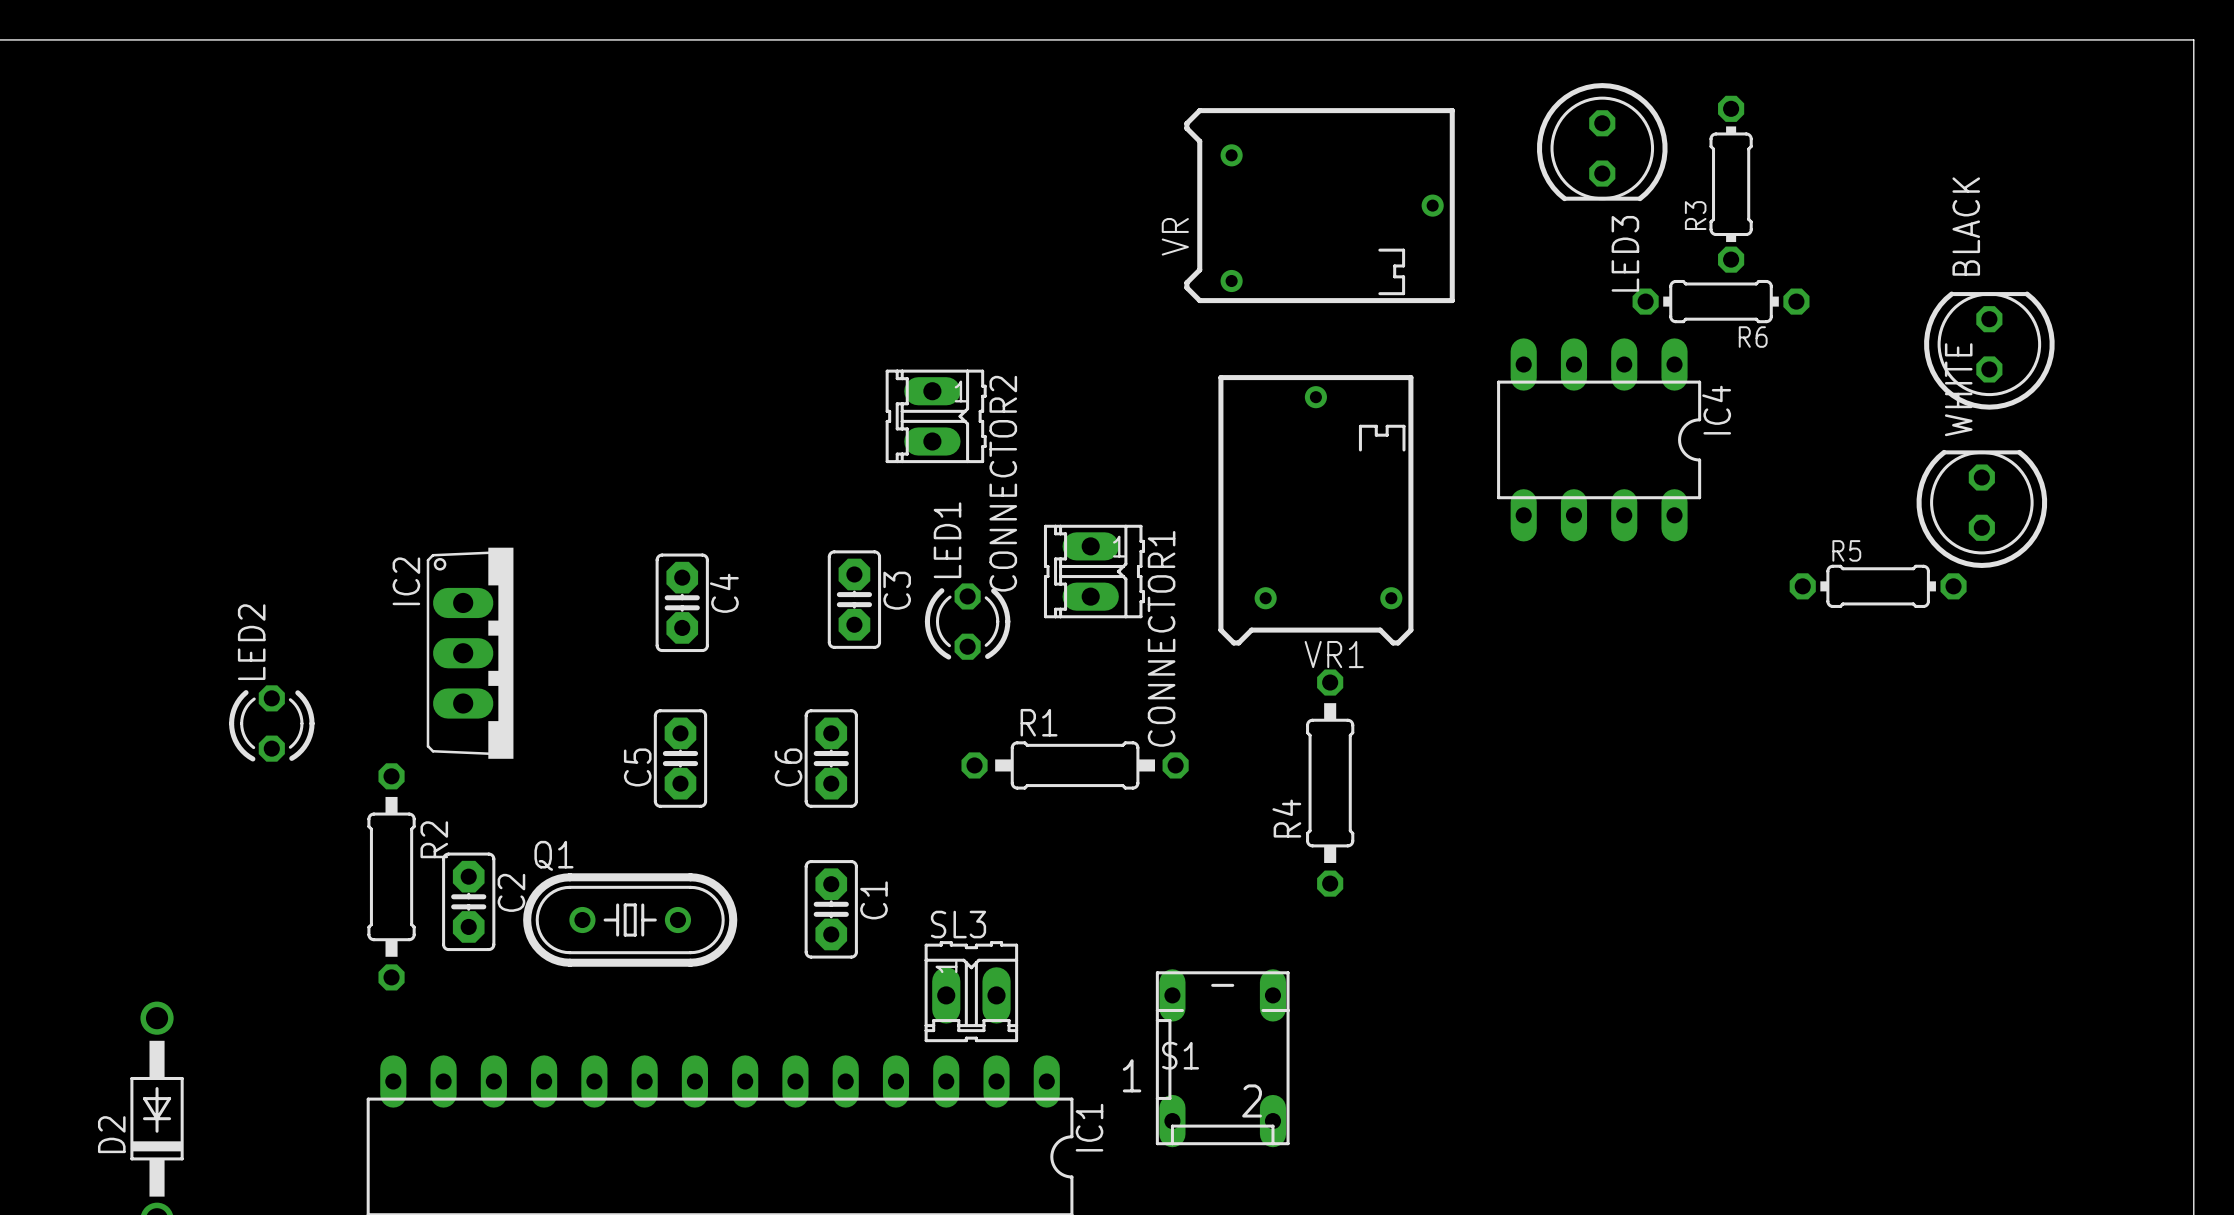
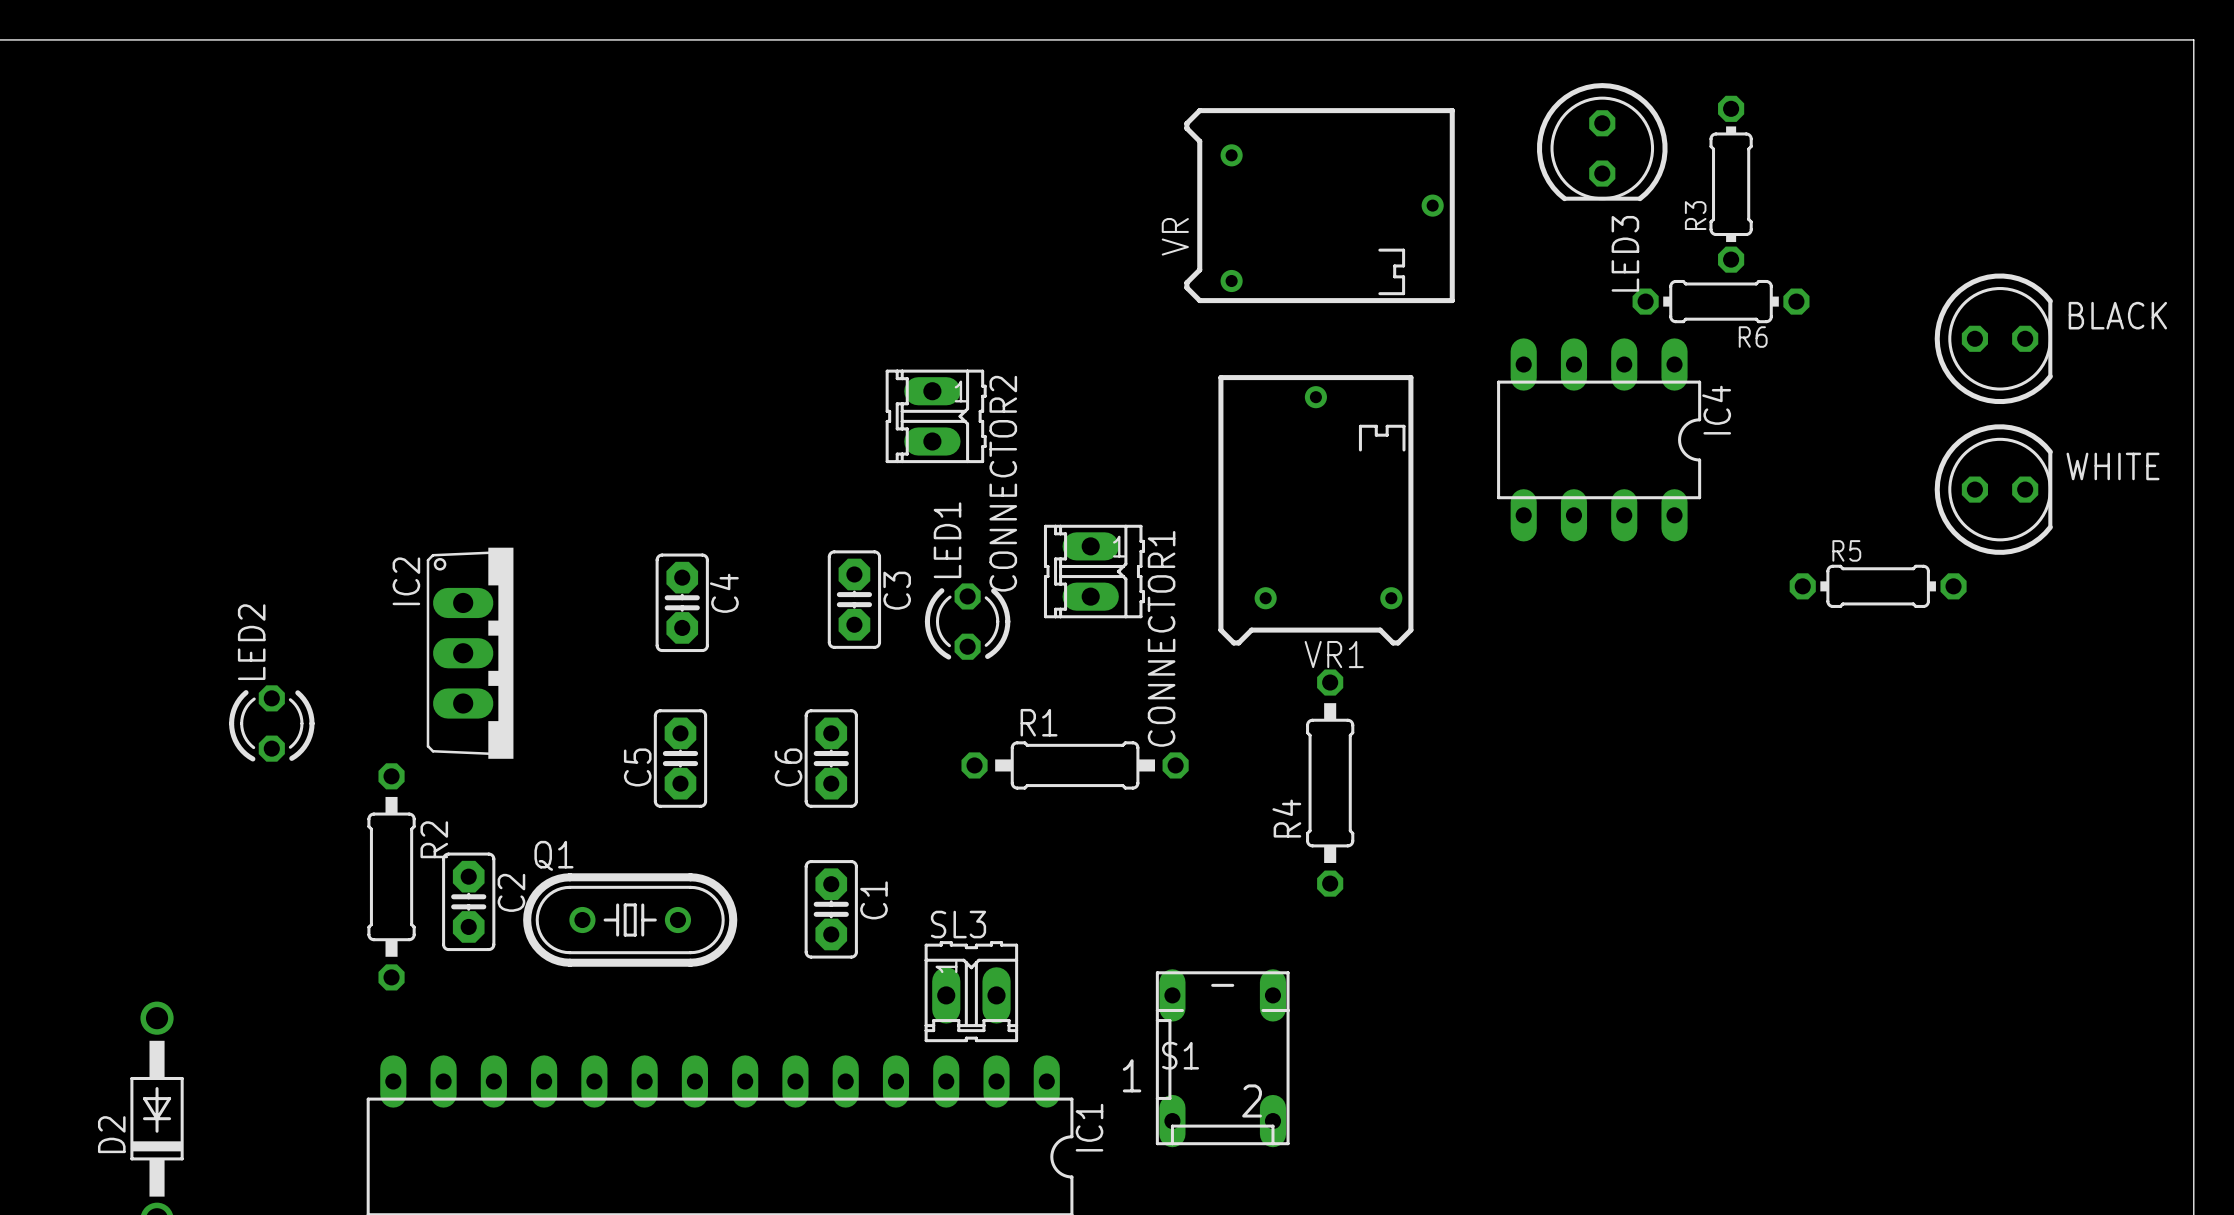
BLACK rotation: 0° (1989, 350) -> 90° clockwise (1993, 338)
WHITE rotation: 0° (1981, 508) -> 90° clockwise (1993, 489)

